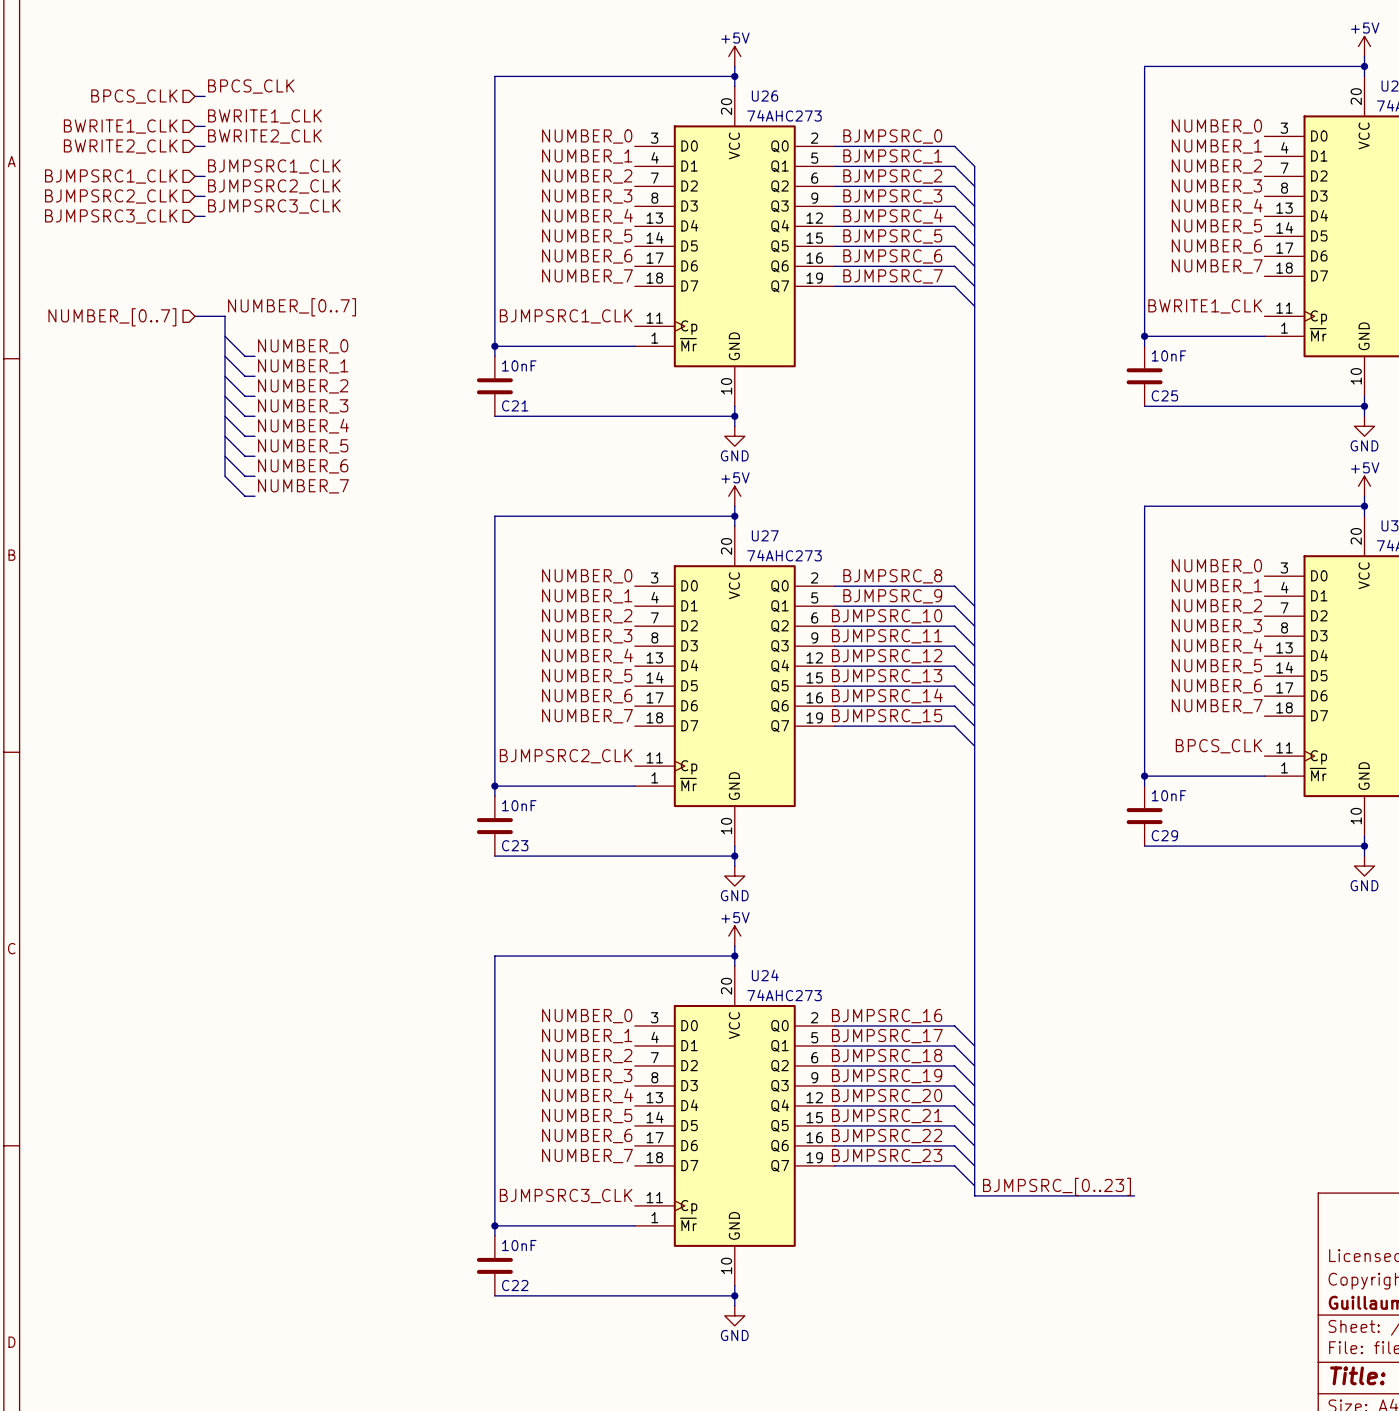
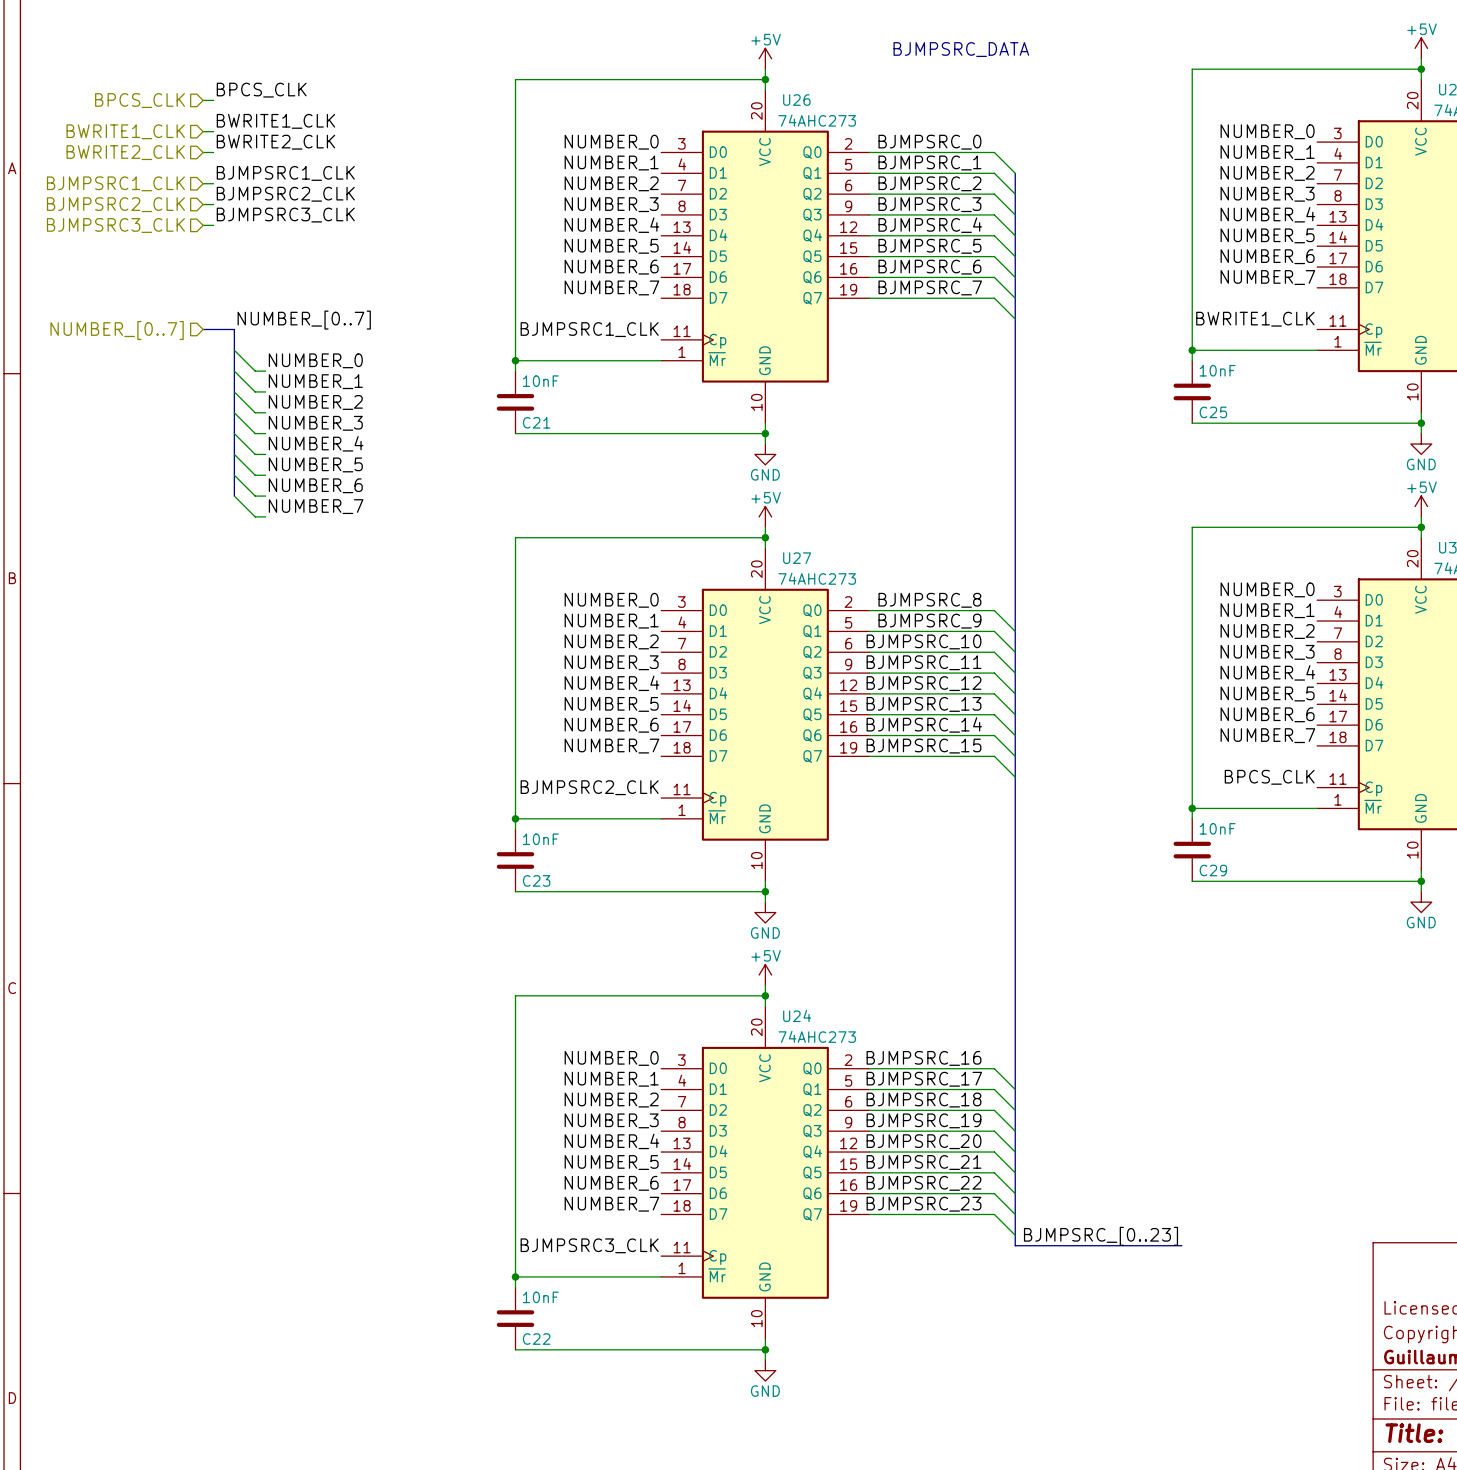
text: none -> BJMPSRC_DATA (961, 49)

